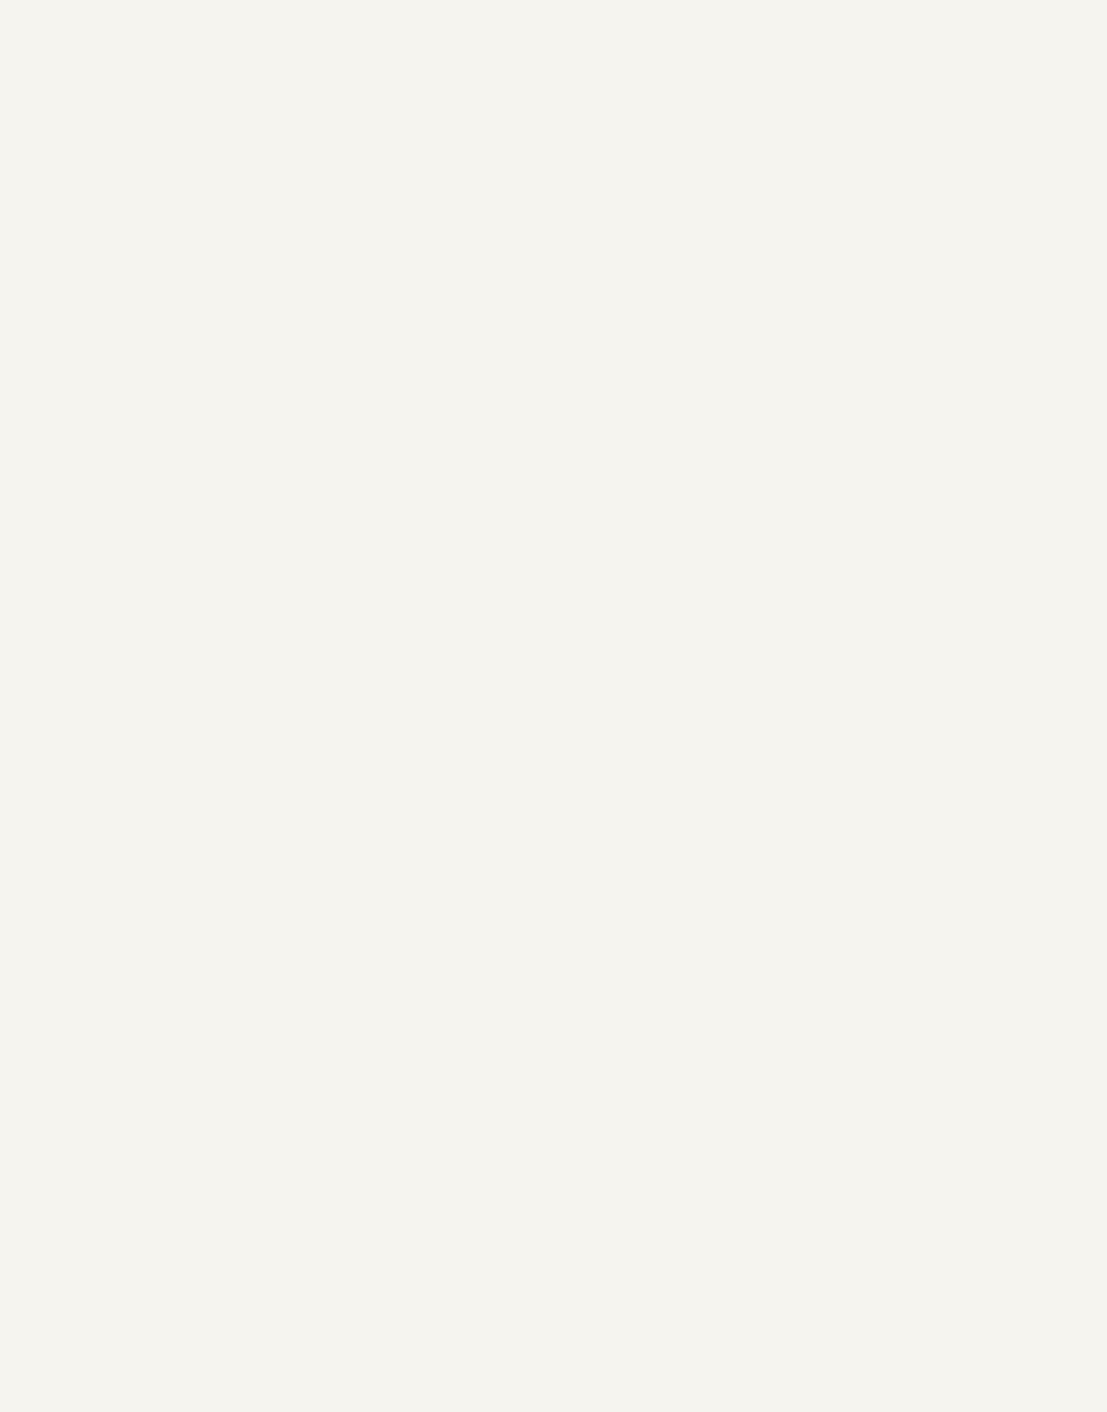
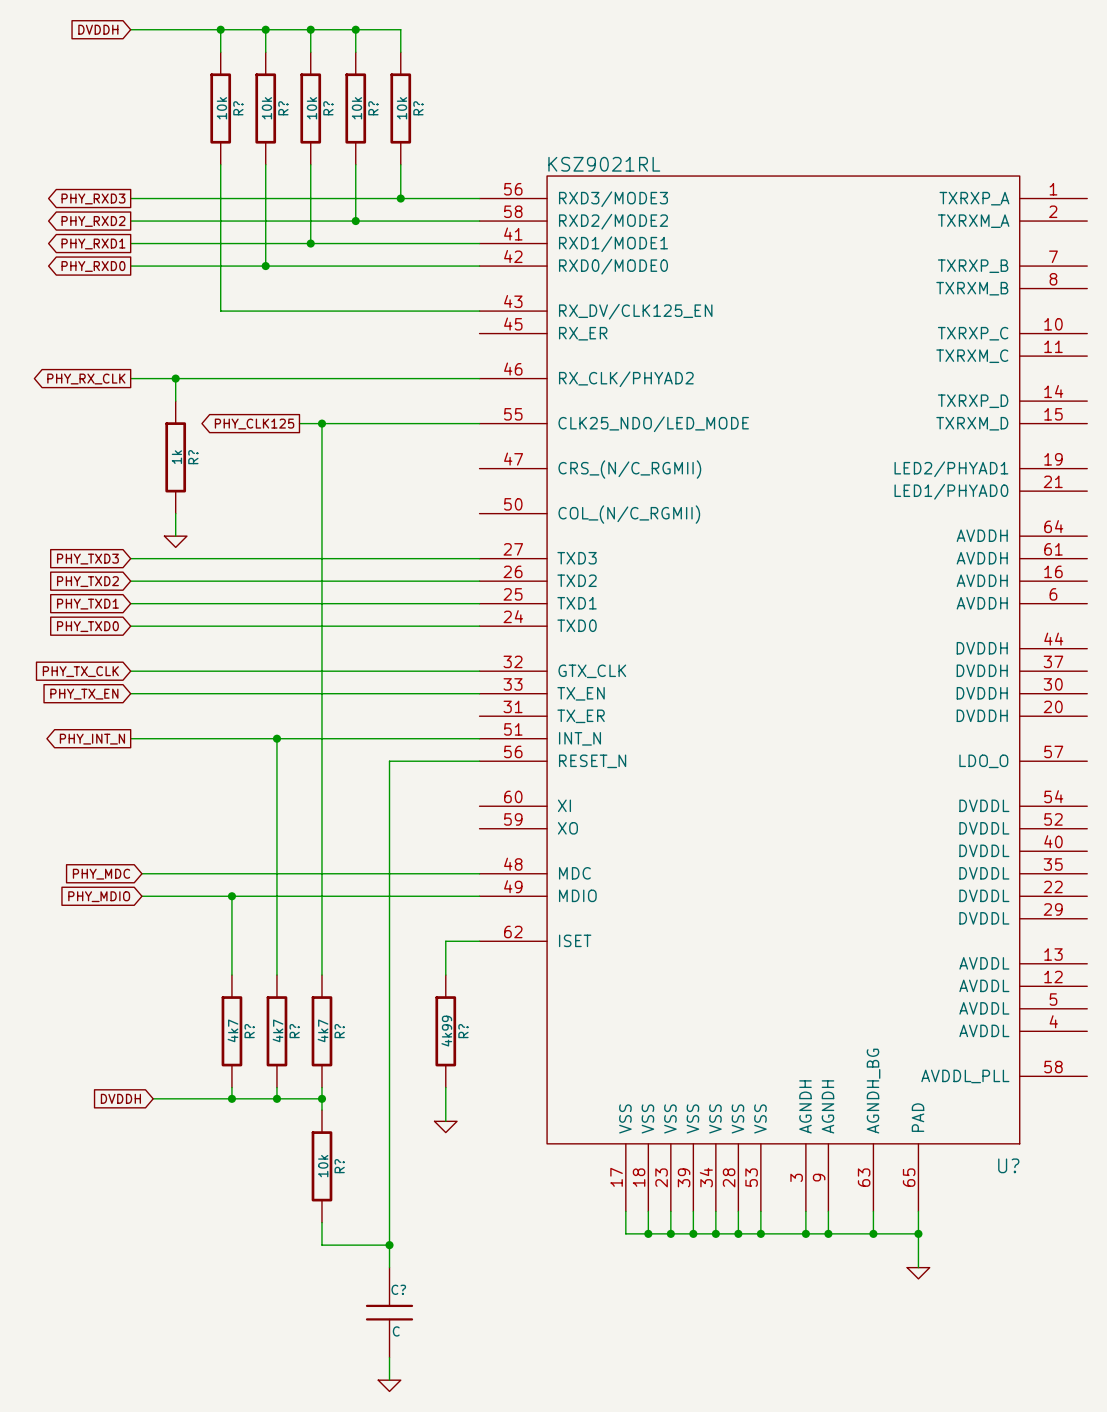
global label: none -> DVDDH (98, 29)
wire: none -> (130, 29) (400, 29) (400, 52)
wire: none -> (220, 29) (220, 52)
junction: none -> (220, 29)
wire: none -> (265, 29) (265, 52)
junction: none -> (265, 29)
wire: none -> (310, 29) (310, 52)
junction: none -> (310, 29)
wire: none -> (355, 29) (355, 52)
junction: none -> (355, 29)
R?: none -> 10k (220, 108)
R?: none -> 10k (265, 108)
R?: none -> 10k (310, 108)
R?: none -> 10k (355, 108)
R?: none -> 10k (400, 108)
wire: none -> (220, 164) (220, 311) (479, 311)
wire: none -> (265, 164) (265, 266)
wire: none -> (310, 164) (310, 243)
wire: none -> (355, 164) (355, 221)
wire: none -> (400, 164) (400, 198)
global label: none -> PHY_RXD3 (93, 198)
wire: none -> (130, 198) (479, 198)
junction: none -> (400, 198)
global label: none -> PHY_RXD2 (93, 221)
wire: none -> (130, 221) (479, 221)
junction: none -> (355, 221)
global label: none -> PHY_RXD1 (93, 243)
wire: none -> (130, 243) (479, 243)
junction: none -> (310, 243)
global label: none -> PHY_RXD0 (93, 266)
wire: none -> (130, 266) (479, 266)
junction: none -> (265, 266)
wire: none -> (130, 378) (479, 378)
wire: none -> (175, 378) (175, 401)
junction: none -> (175, 378)
global label: none -> PHY_RX_CLK (86, 379)
wire: none -> (299, 423) (479, 423)
wire: none -> (321, 423) (321, 975)
junction: none -> (321, 423)
global label: none -> PHY_CLK125 (254, 424)
R?: none -> 1k (175, 457)
wire: none -> (175, 513) (175, 536)
power symbol: none -> (175, 541)
wire: none -> (130, 558) (479, 558)
global label: none -> PHY_TXD3 (87, 559)
global label: none -> PHY_TXD2 (87, 581)
wire: none -> (130, 581) (479, 581)
wire: none -> (130, 603) (479, 603)
global label: none -> PHY_TXD1 (87, 604)
global label: none -> PHY_TXD0 (87, 626)
wire: none -> (130, 626) (479, 626)
global label: none -> PHY_TX_CLK (80, 671)
wire: none -> (130, 671) (479, 671)
wire: none -> (130, 693) (479, 693)
U?: none -> KSZ9021RL (783, 693)
global label: none -> PHY_TX_EN (84, 694)
wire: none -> (130, 738) (479, 738)
wire: none -> (276, 738) (276, 975)
junction: none -> (276, 738)
global label: none -> PHY_INT_N (92, 739)
wire: none -> (479, 761) (389, 761) (389, 1267)
wire: none -> (141, 873) (479, 873)
global label: none -> PHY_MDC (101, 874)
global label: none -> PHY_MDIO (99, 896)
wire: none -> (141, 896) (479, 896)
wire: none -> (231, 896) (231, 975)
junction: none -> (231, 896)
wire: none -> (479, 941) (445, 941) (445, 975)
R?: none -> 4k7 (231, 1031)
R?: none -> 4k7 (276, 1031)
R?: none -> 4k7 (321, 1031)
R?: none -> 4k99 (445, 1031)
wire: none -> (231, 1087) (231, 1098)
wire: none -> (276, 1087) (276, 1098)
wire: none -> (321, 1087) (321, 1110)
wire: none -> (445, 1087) (445, 1121)
global label: none -> DVDDH (120, 1098)
wire: none -> (153, 1098) (321, 1098)
junction: none -> (231, 1098)
junction: none -> (276, 1098)
junction: none -> (321, 1098)
power symbol: none -> (445, 1126)
R?: none -> 10k (321, 1166)
wire: none -> (625, 1211) (625, 1233) (918, 1233)
wire: none -> (648, 1211) (648, 1233)
wire: none -> (670, 1211) (670, 1233)
wire: none -> (693, 1211) (693, 1233)
wire: none -> (715, 1211) (715, 1233)
wire: none -> (738, 1211) (738, 1233)
wire: none -> (760, 1211) (760, 1233)
wire: none -> (805, 1211) (805, 1233)
wire: none -> (828, 1211) (828, 1233)
wire: none -> (873, 1211) (873, 1233)
wire: none -> (918, 1211) (918, 1267)
wire: none -> (321, 1222) (321, 1245) (389, 1245)
junction: none -> (648, 1233)
junction: none -> (670, 1233)
junction: none -> (693, 1233)
junction: none -> (715, 1233)
junction: none -> (738, 1233)
junction: none -> (760, 1233)
junction: none -> (805, 1233)
junction: none -> (828, 1233)
junction: none -> (873, 1233)
junction: none -> (918, 1233)
junction: none -> (389, 1245)
power symbol: none -> (918, 1273)
C?: none -> C (389, 1312)
wire: none -> (389, 1357) (389, 1380)
power symbol: none -> (389, 1385)

